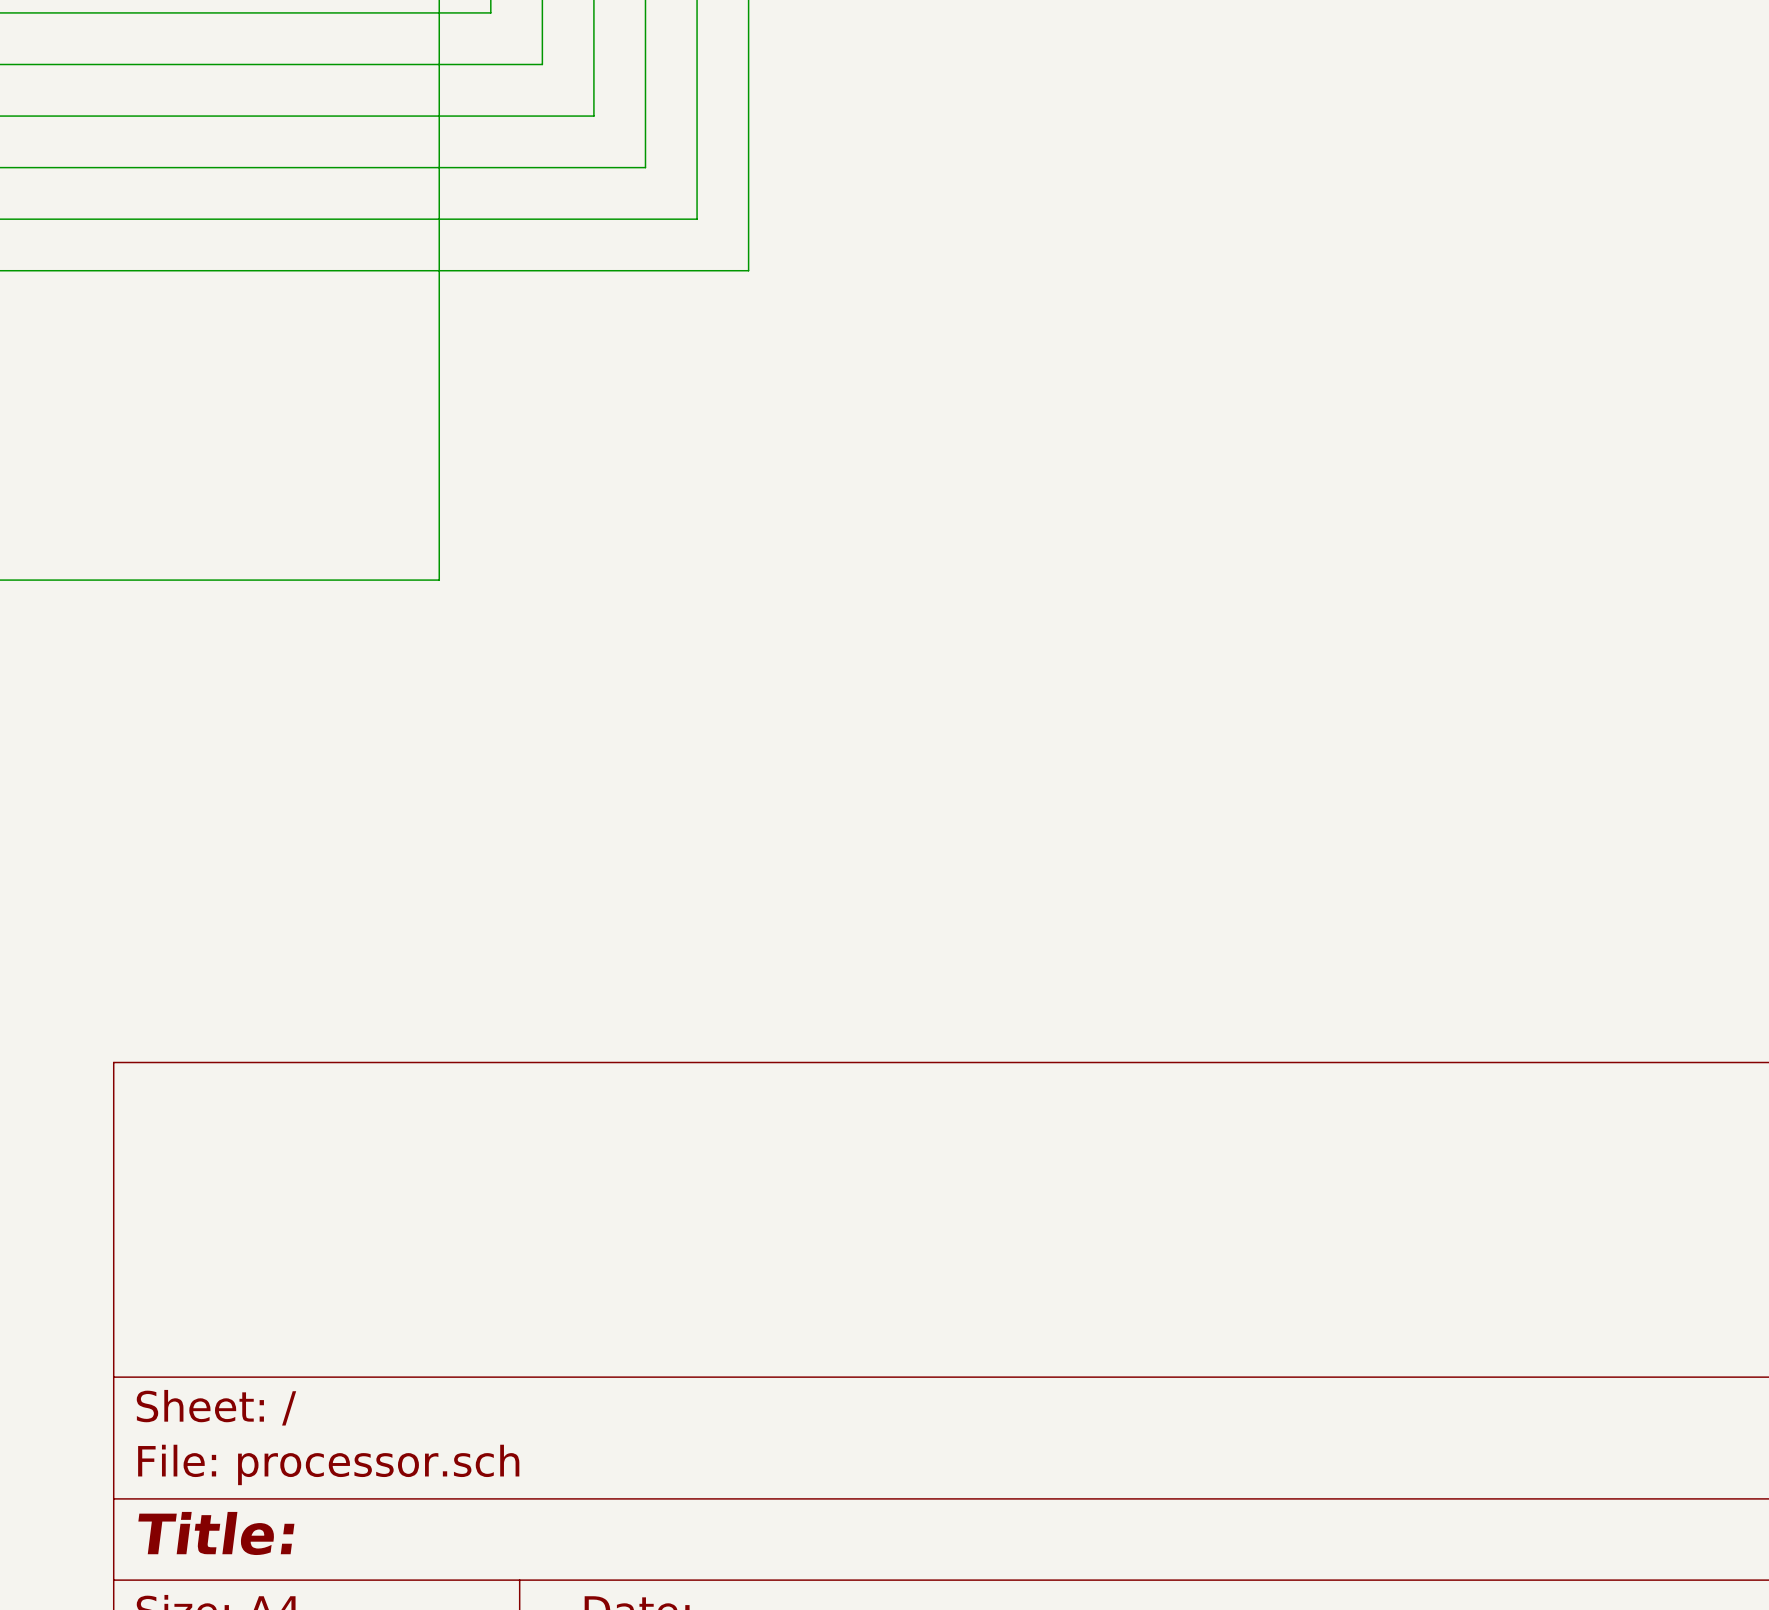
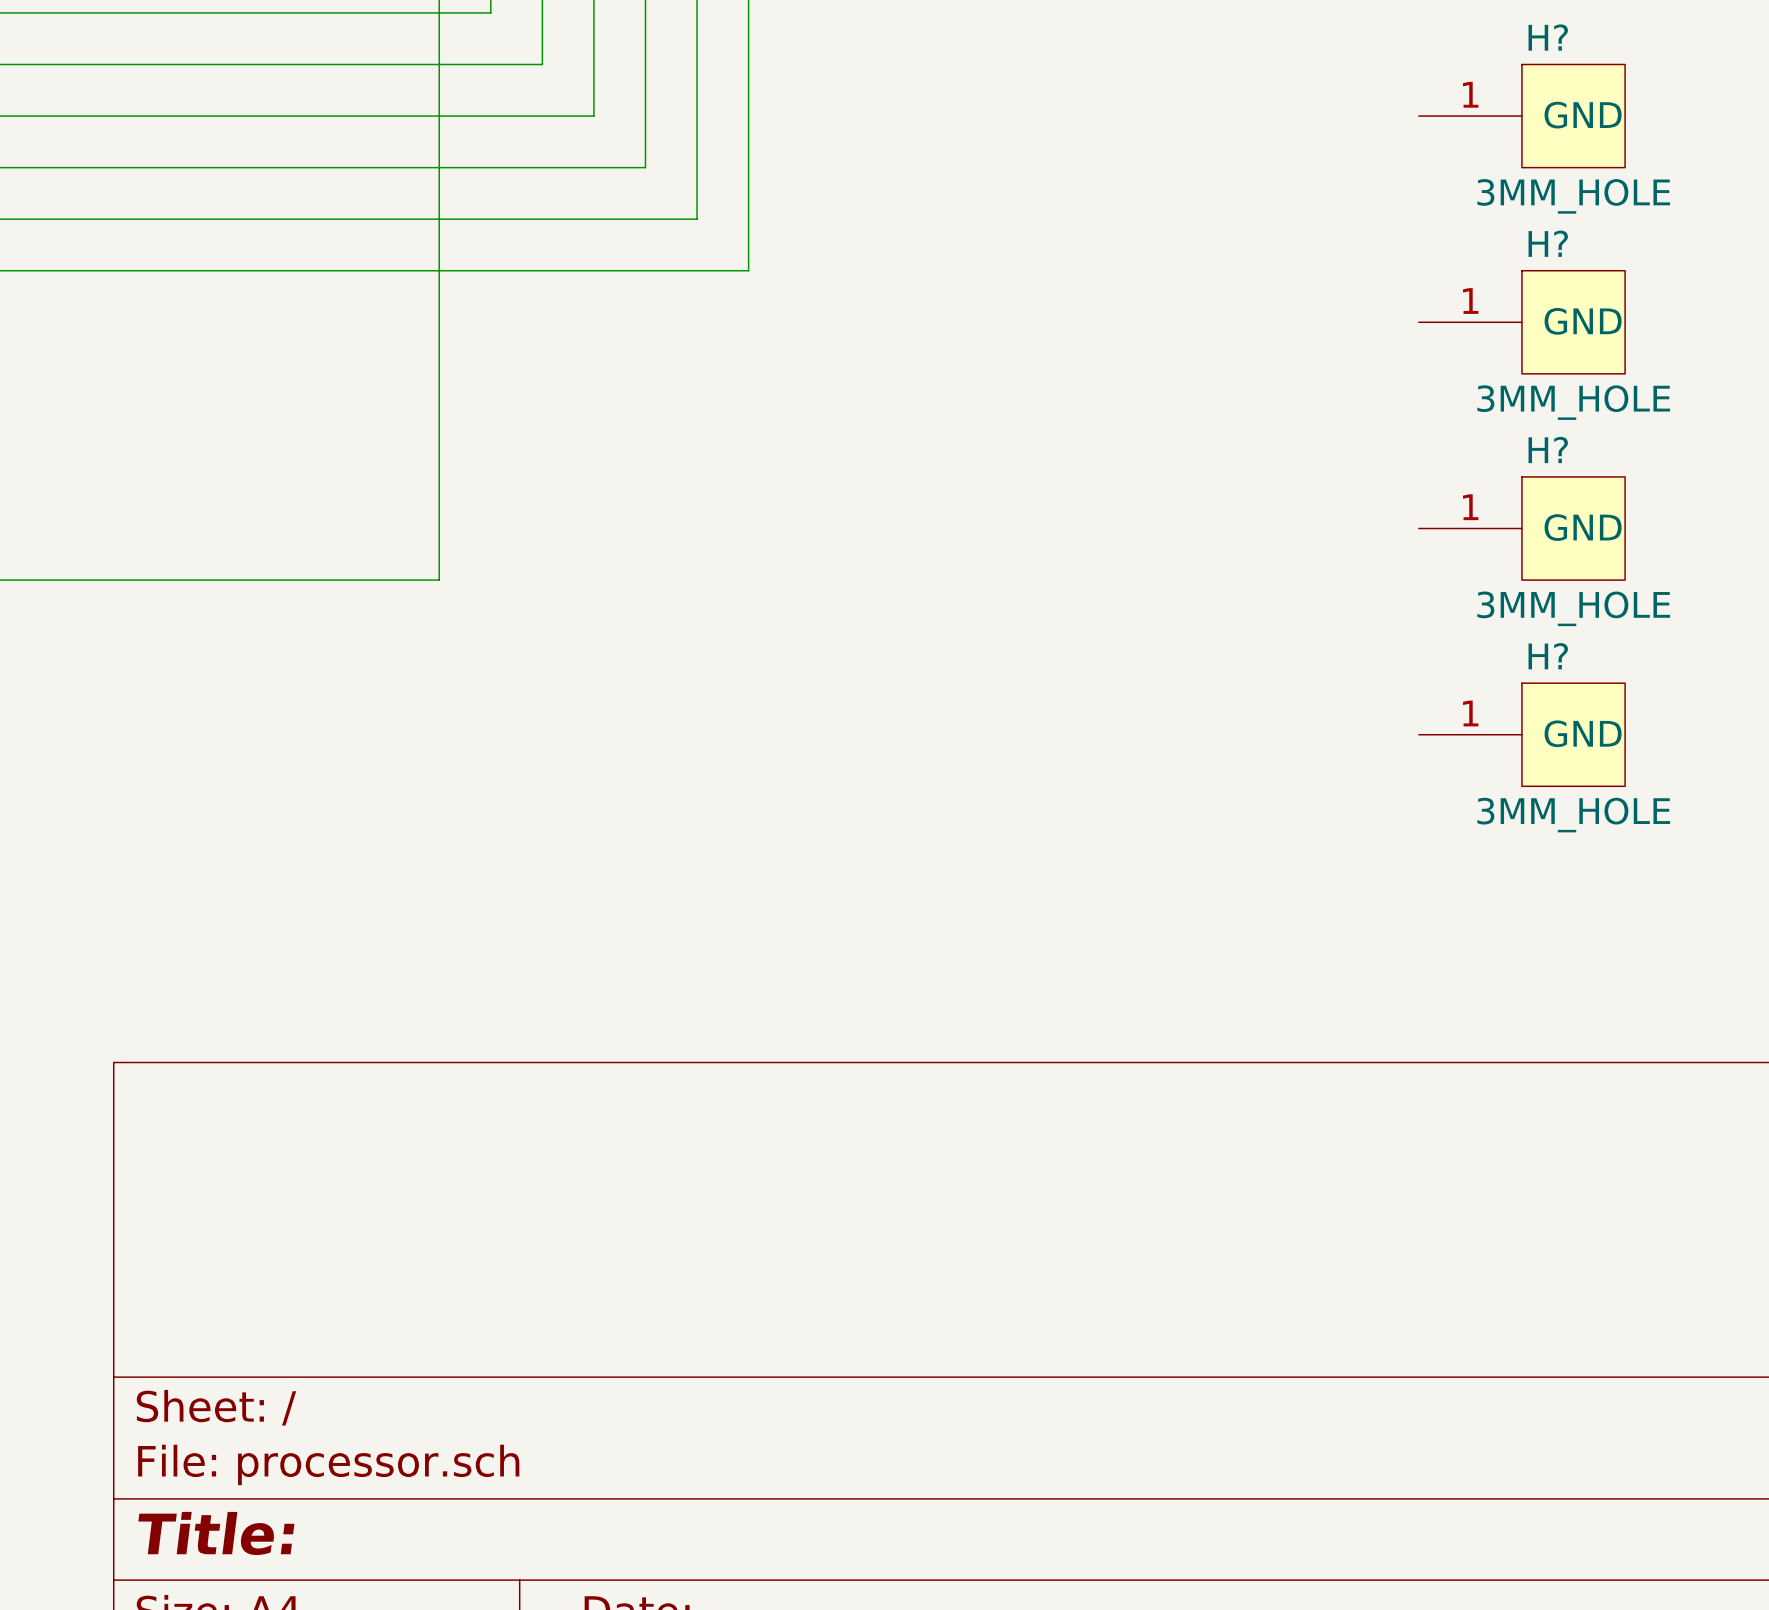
H?: none -> 3MM_HOLE (1521, 116)
H?: none -> 3MM_HOLE (1521, 322)
H?: none -> 3MM_HOLE (1521, 528)
H?: none -> 3MM_HOLE (1521, 734)

